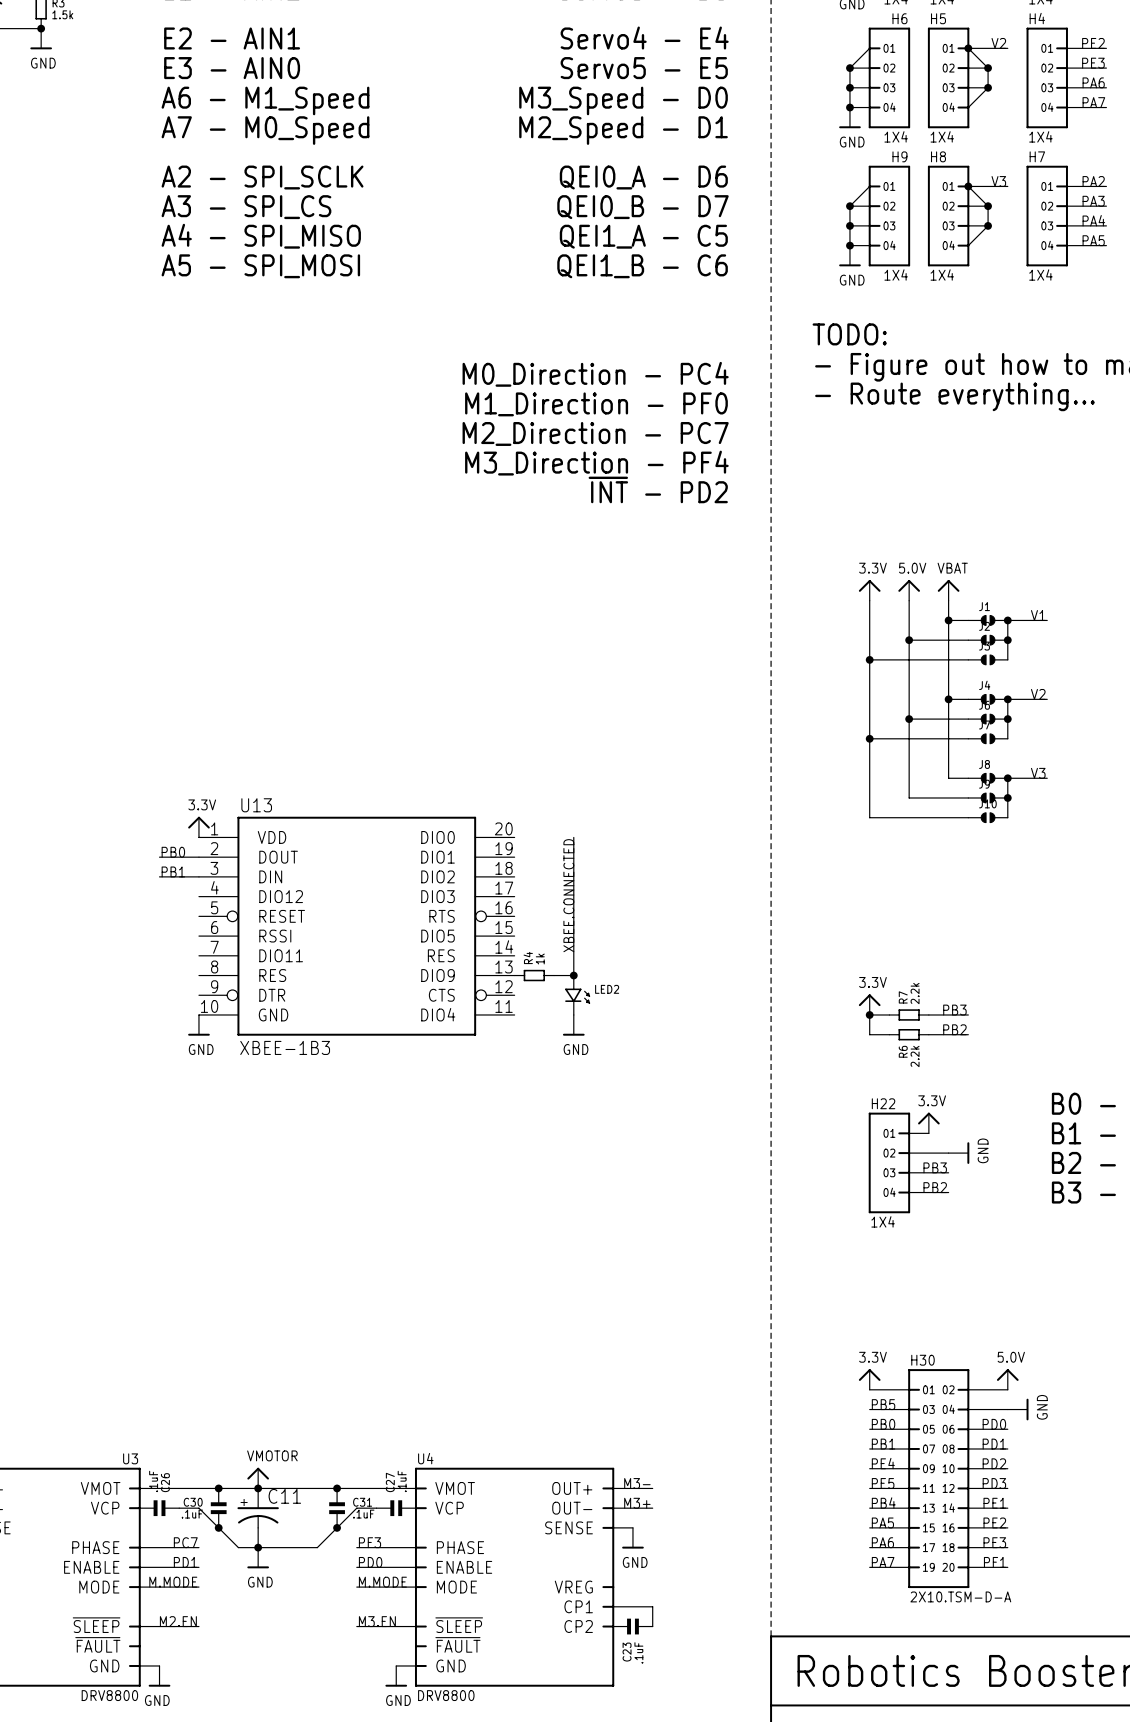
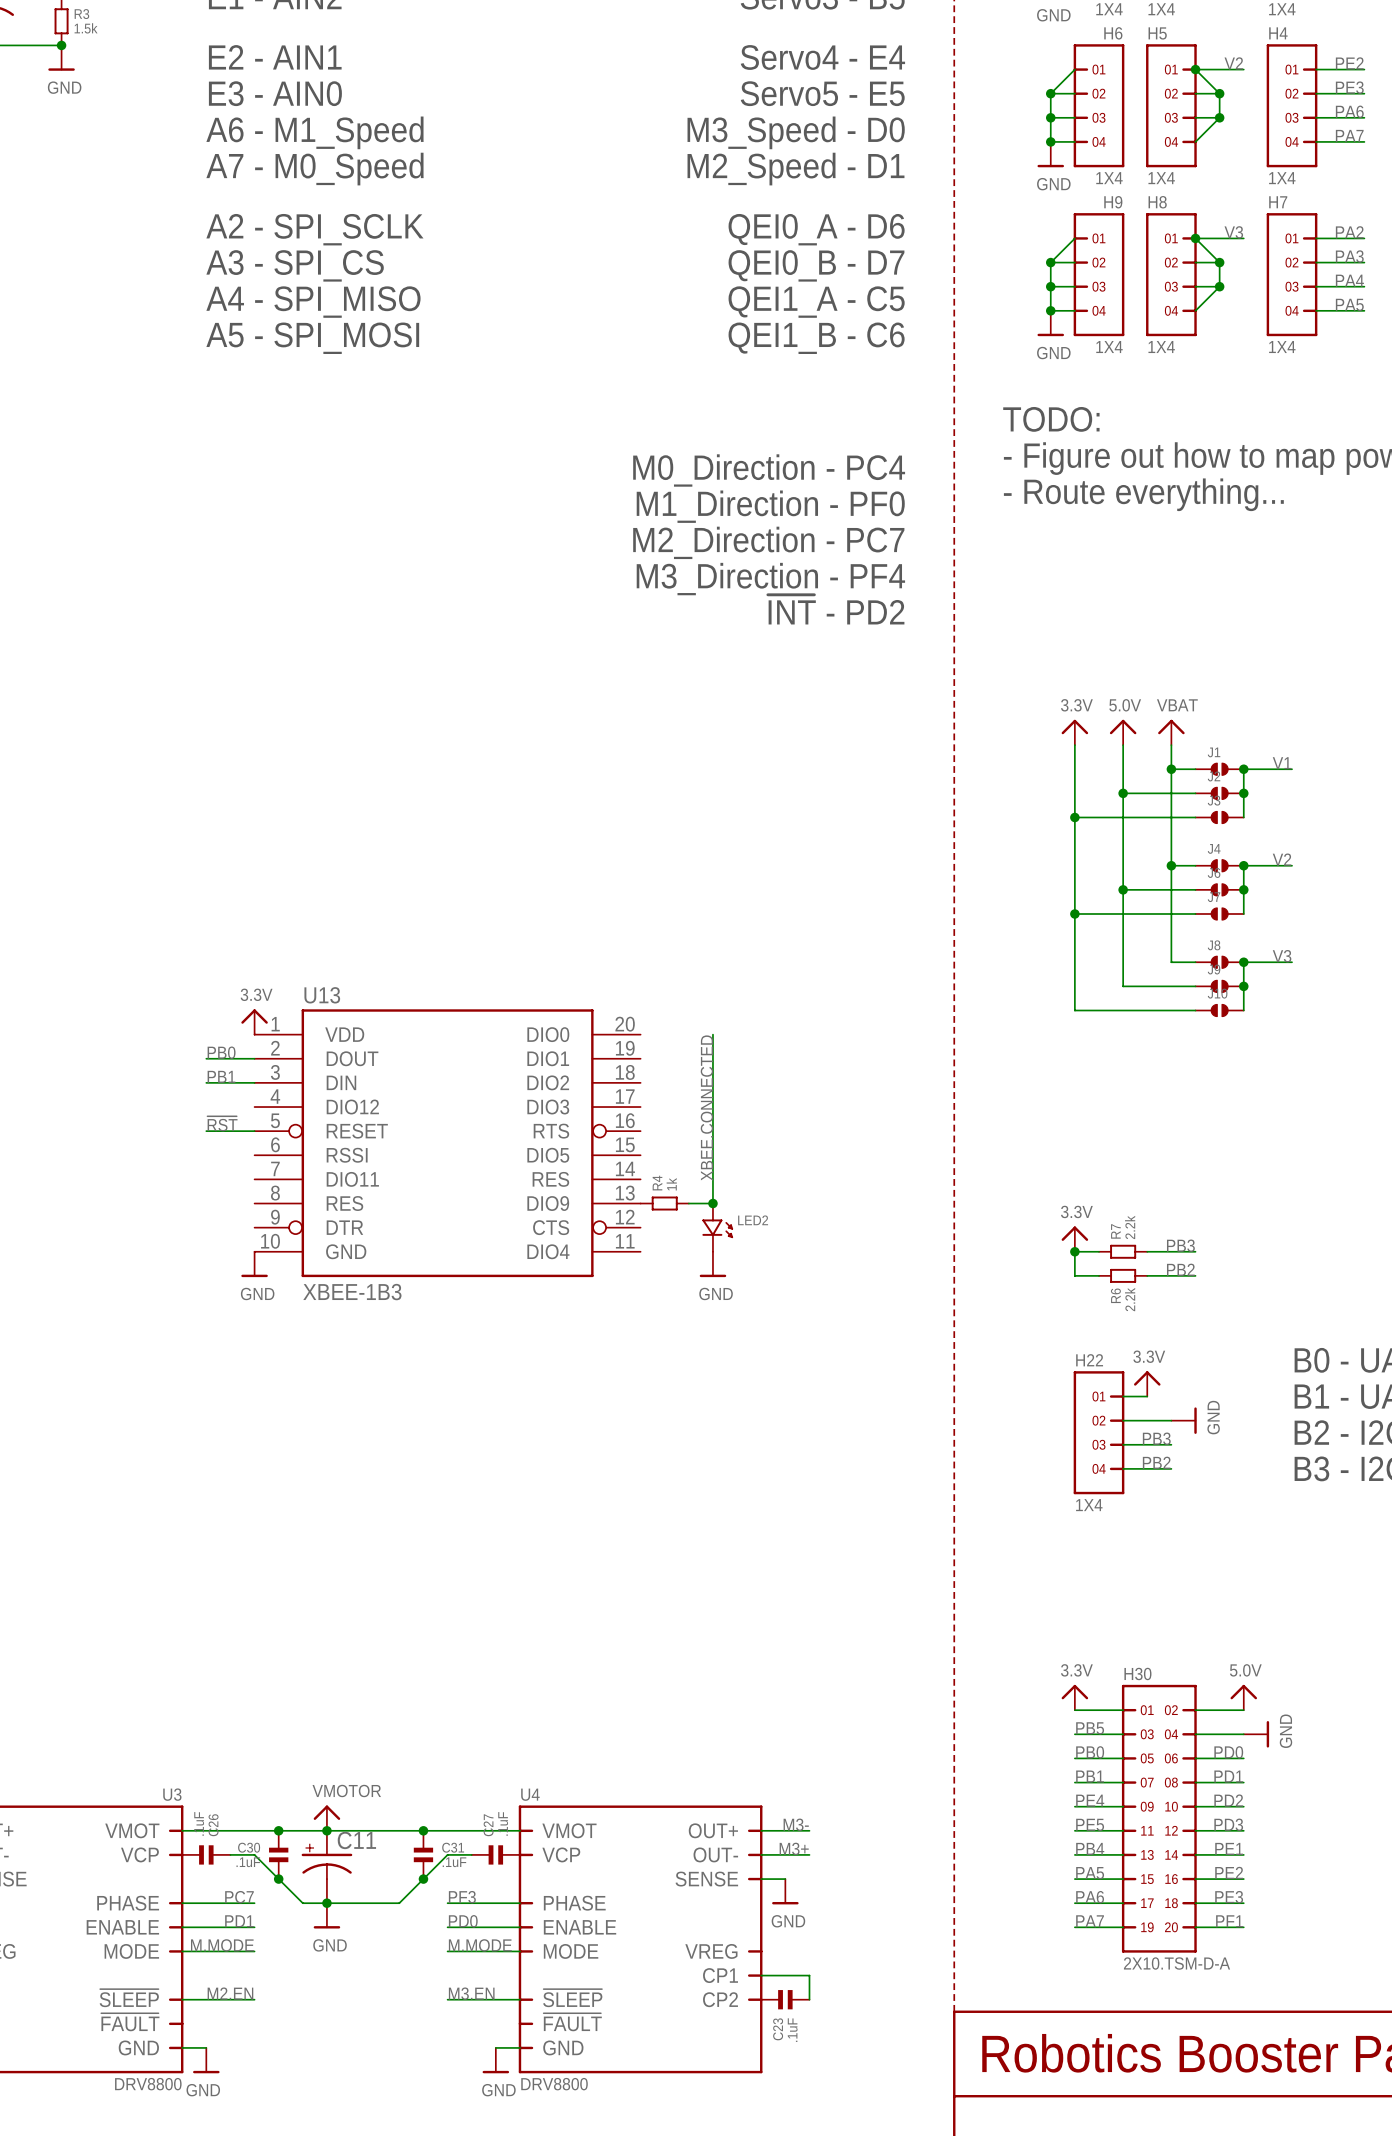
label: none -> ~{RST} (222, 1123)
wire: none -> (206, 1131) (254, 1131)

